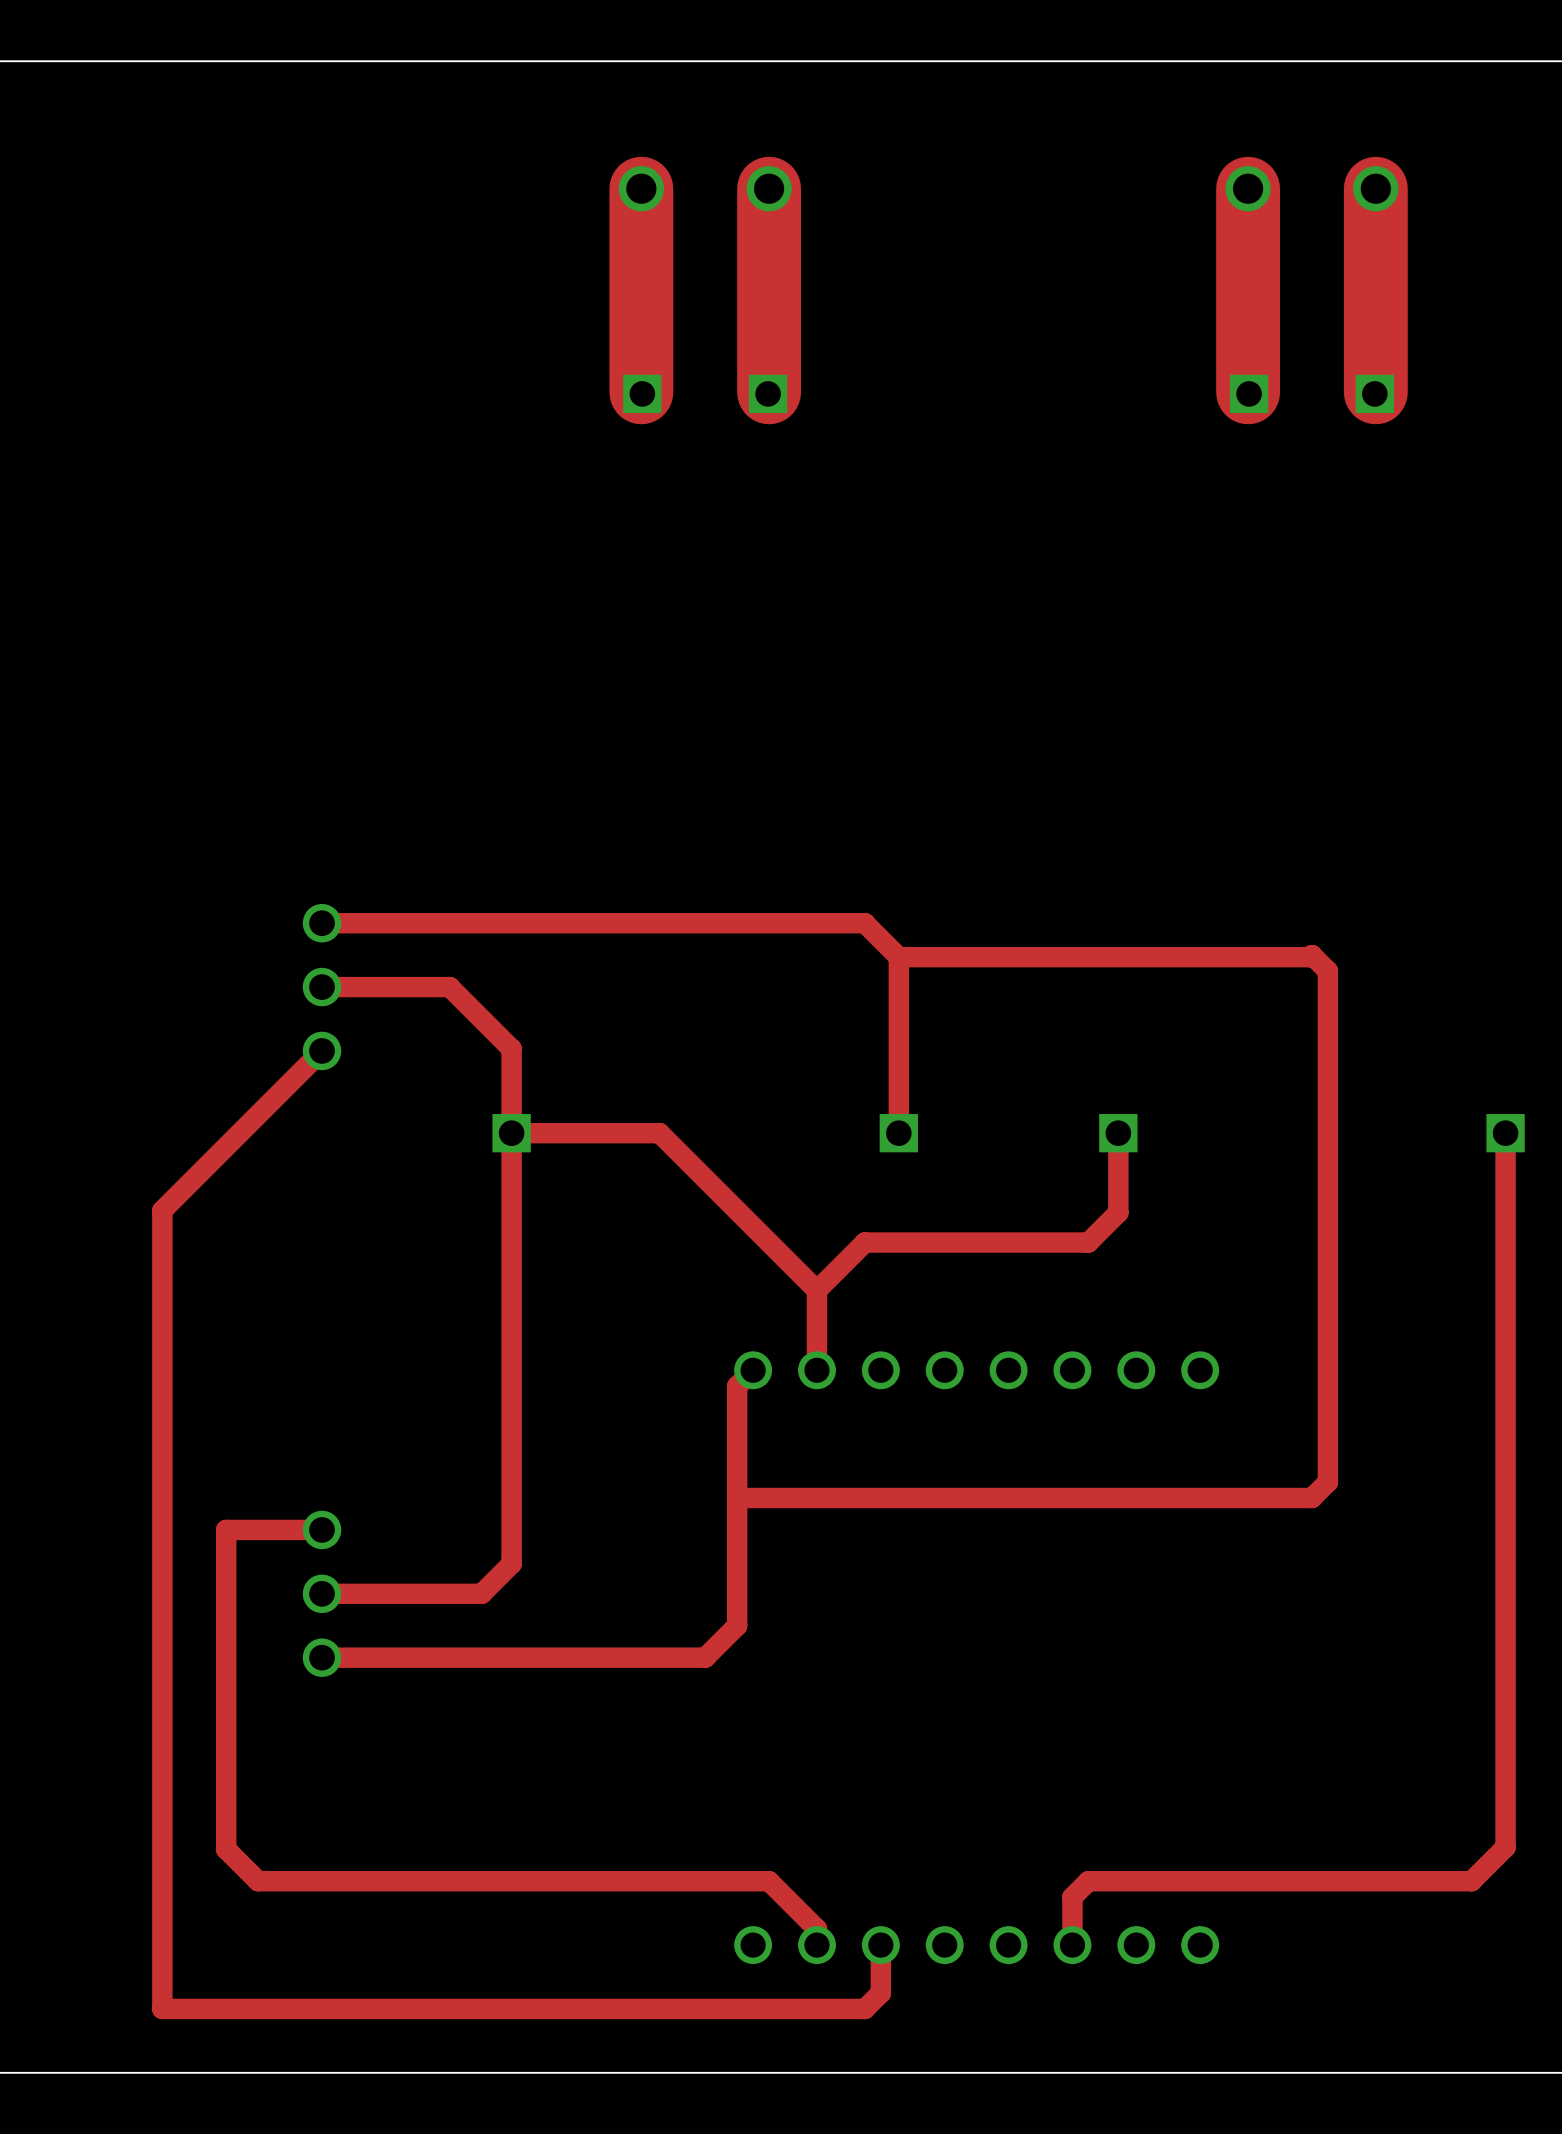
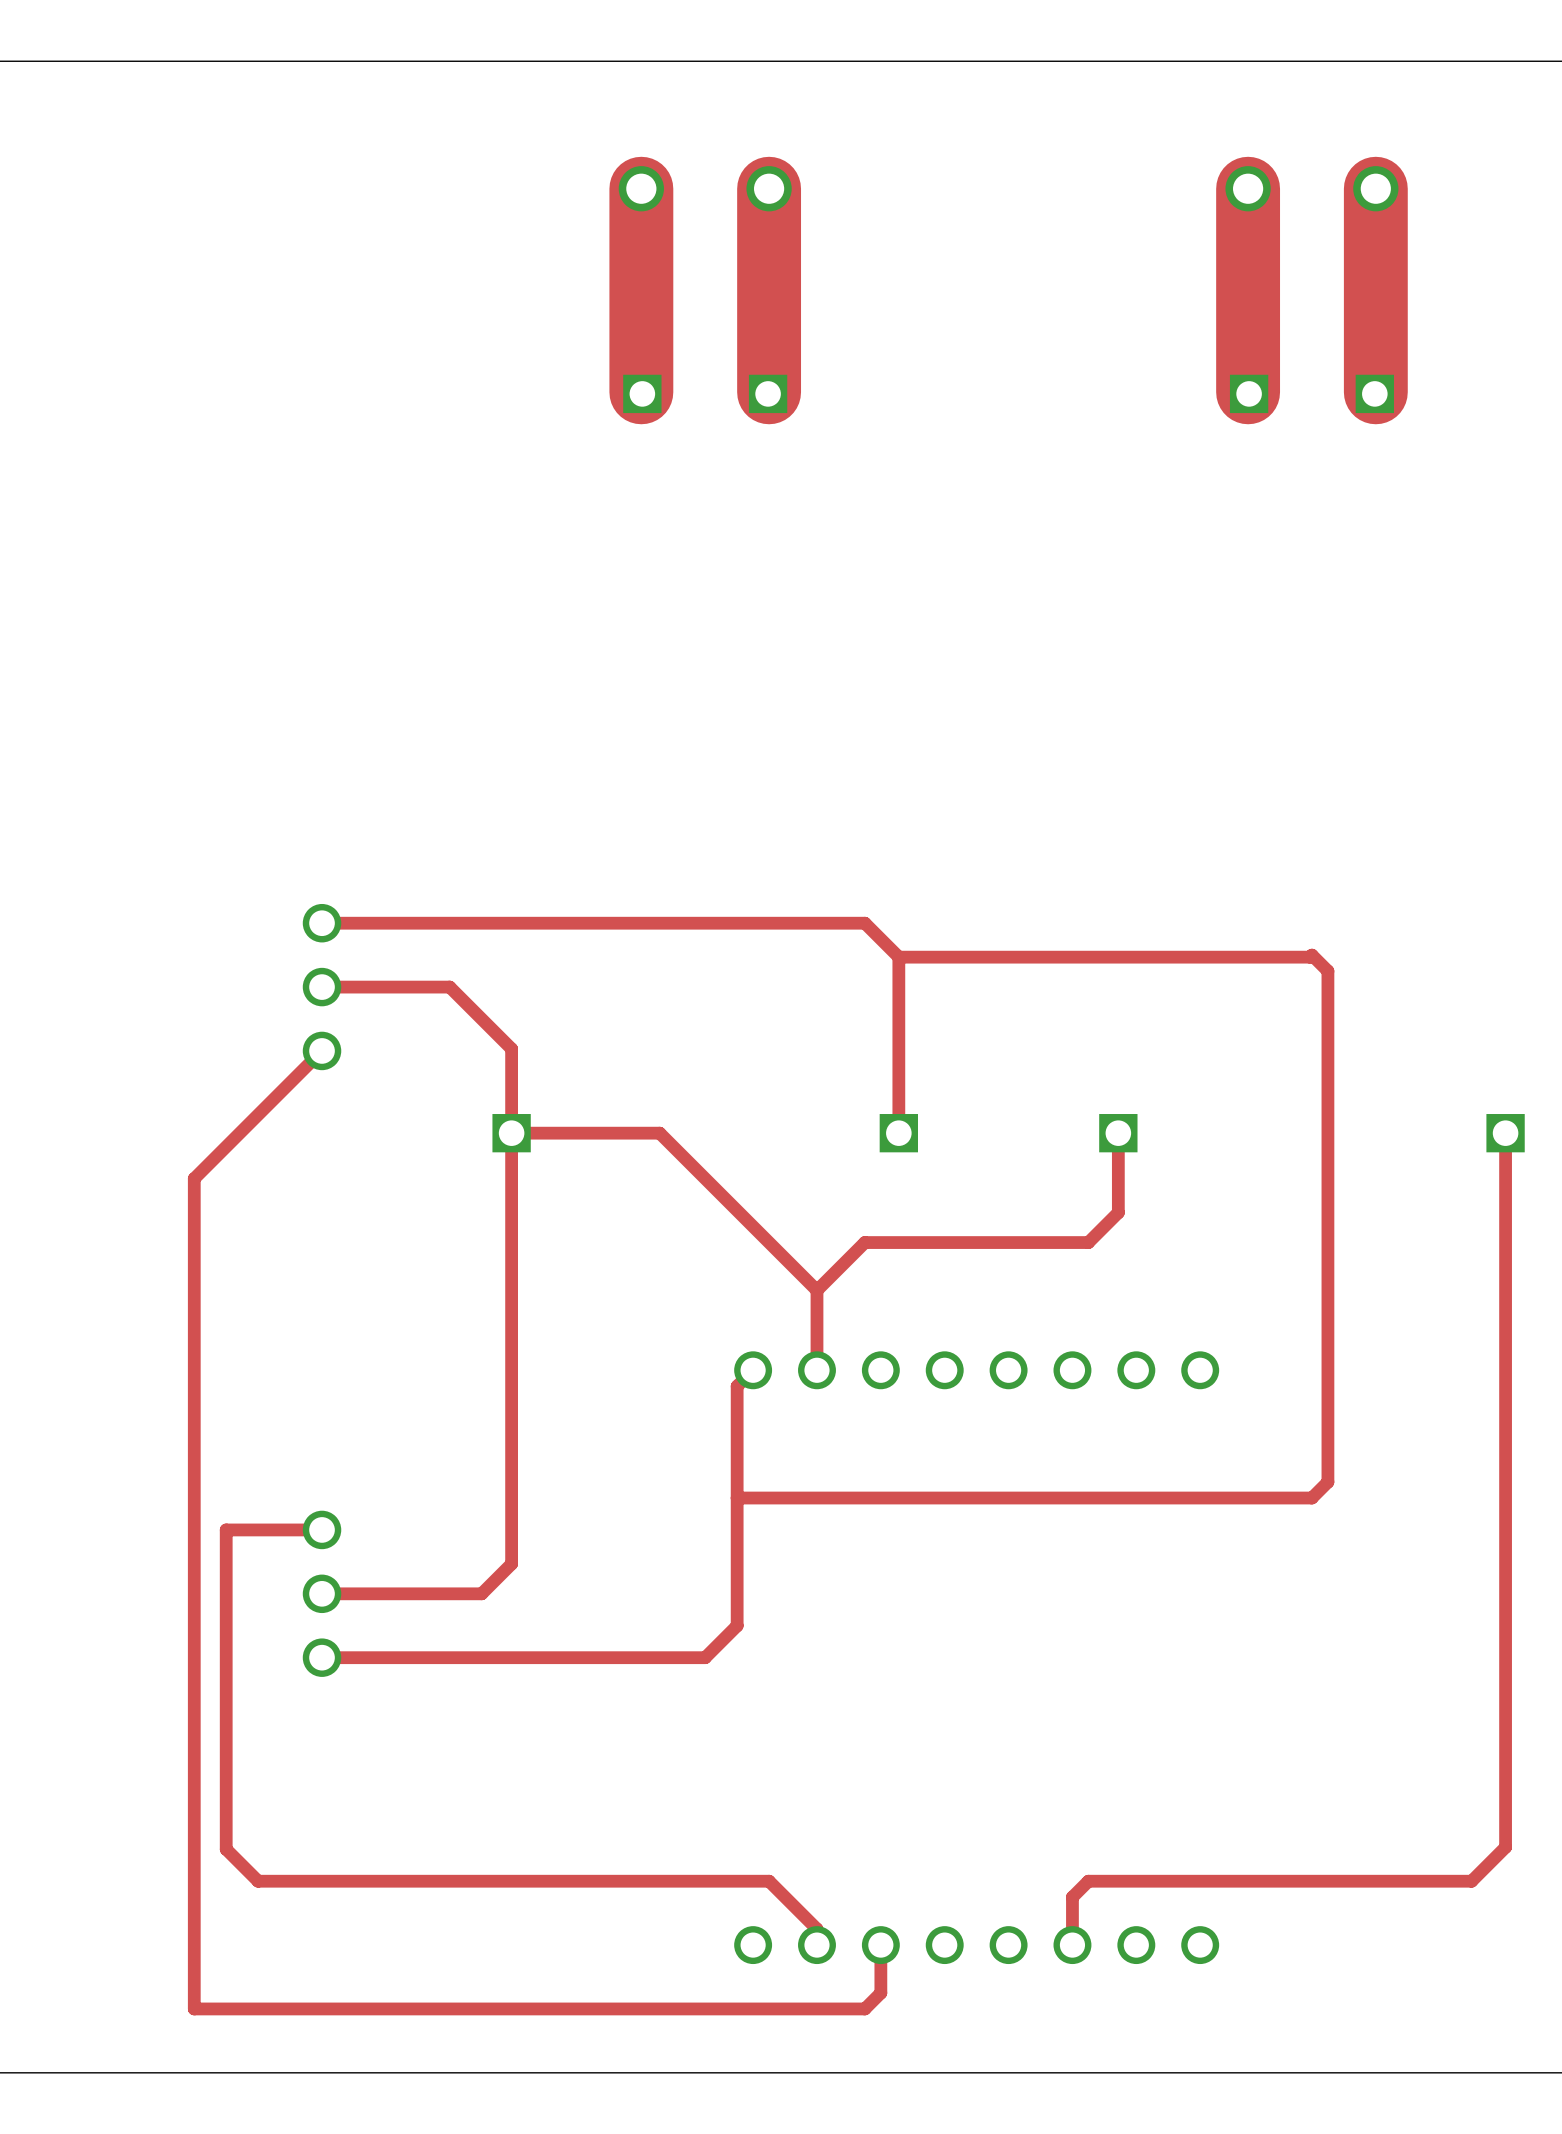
top track width: thick (322, 923) (864, 923) (898, 957) -> thin (322, 923) (864, 923) (898, 957)
top track width: thick (898, 957) (898, 1133) -> thin (898, 957) (898, 1133)
top track width: thick (898, 957) (1309, 957) (1311, 955) (1327, 971) (1327, 1482) (1311, 1498) (737, 1498) -> thin (898, 957) (1309, 957) (1311, 955) (1327, 971) (1327, 1482) (1311, 1498) (737, 1498)
top track width: thick (322, 987) (449, 987) (511, 1048) (511, 1563) (481, 1593) (322, 1593) -> thin (322, 987) (449, 987) (511, 1048) (511, 1563) (481, 1593) (322, 1593)
top track width: thick (322, 1050) (194, 1178) -> thin (322, 1050) (194, 1178)
top track width: thick (511, 1133) (659, 1133) (816, 1290) -> thin (511, 1133) (659, 1133) (816, 1290)
top track width: thick (1118, 1133) (1118, 1212) (1088, 1242) (864, 1242) (816, 1290) -> thin (1118, 1133) (1118, 1212) (1088, 1242) (864, 1242) (816, 1290)
top track width: thick (1505, 1133) (1505, 1847) (1471, 1881) (1088, 1881) (1072, 1897) (1072, 1945) -> thin (1505, 1133) (1505, 1847) (1471, 1881) (1088, 1881) (1072, 1897) (1072, 1945)
top track: (194, 1178) (162, 1210) (162, 2008) (194, 2008) -> (194, 1178) (194, 2008)
top track width: thick (816, 1290) (816, 1370) -> thin (816, 1290) (816, 1370)
top track width: thick (753, 1370) (737, 1386) (737, 1625) (705, 1657) (322, 1657) -> thin (753, 1370) (737, 1386) (737, 1625) (705, 1657) (322, 1657)
top track width: thick (322, 1529) (226, 1529) (226, 1849) (258, 1881) (769, 1881) (816, 1929) (816, 1945) -> thin (322, 1529) (226, 1529) (226, 1849) (258, 1881) (769, 1881) (816, 1929) (816, 1945)
top track width: thick (880, 1945) (880, 1992) (864, 2008) (194, 2008) -> thin (880, 1945) (880, 1992) (864, 2008) (194, 2008)

